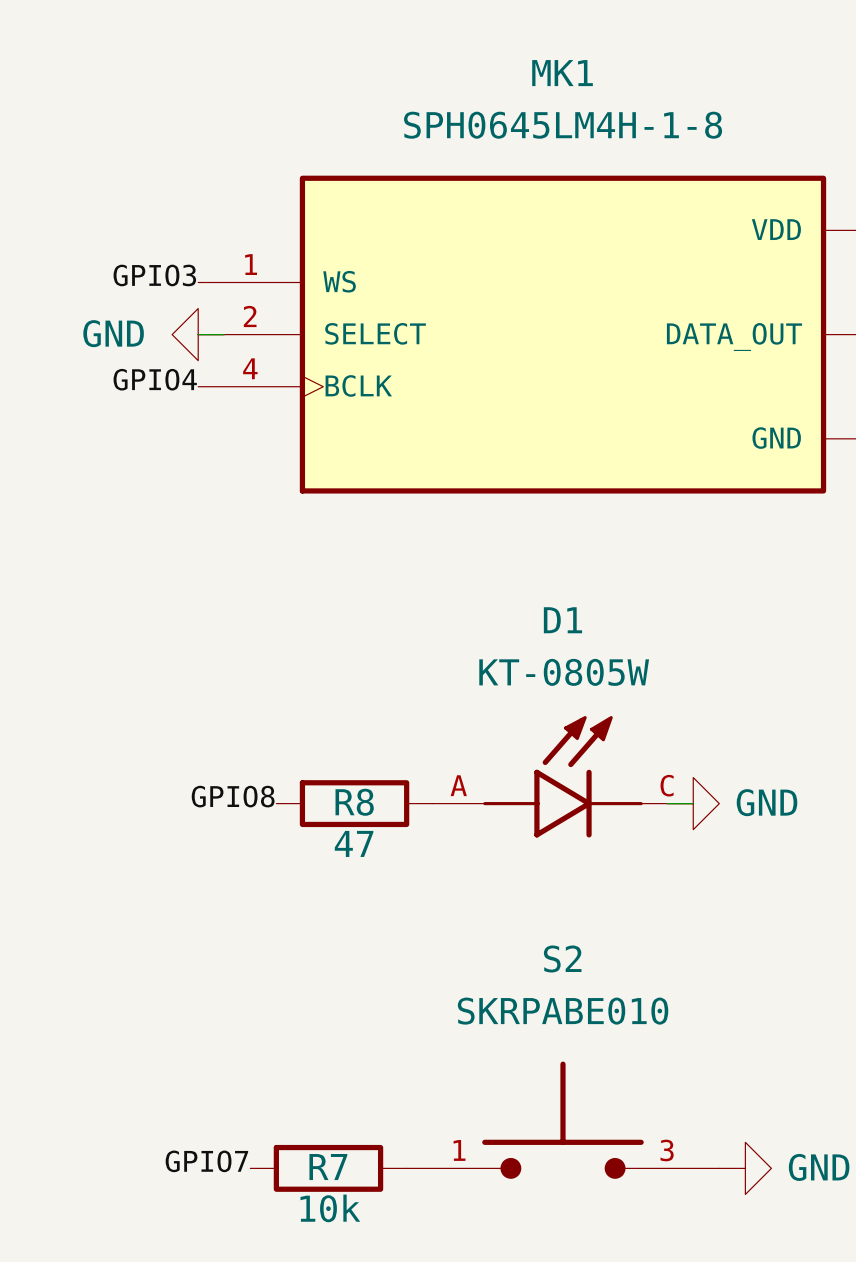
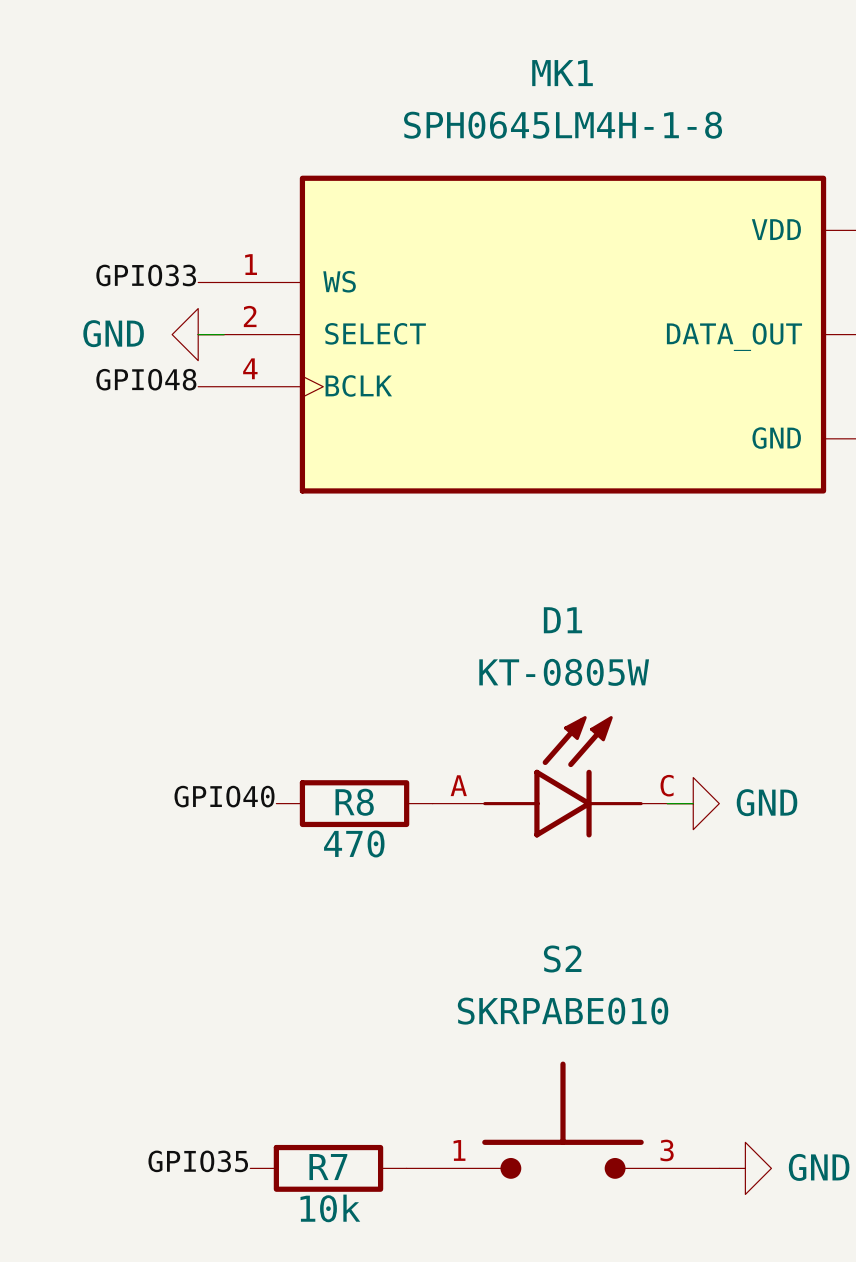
label: GPIO3 (154, 275) -> GPIO33 (146, 275)
label: GPIO4 (155, 379) -> GPIO48 (146, 379)
label: GPIO8 (233, 796) -> GPIO40 (224, 796)
R8 value: 47 (354, 843) -> 470 (354, 843)
label: GPIO7 (206, 1161) -> GPIO35 (198, 1161)

